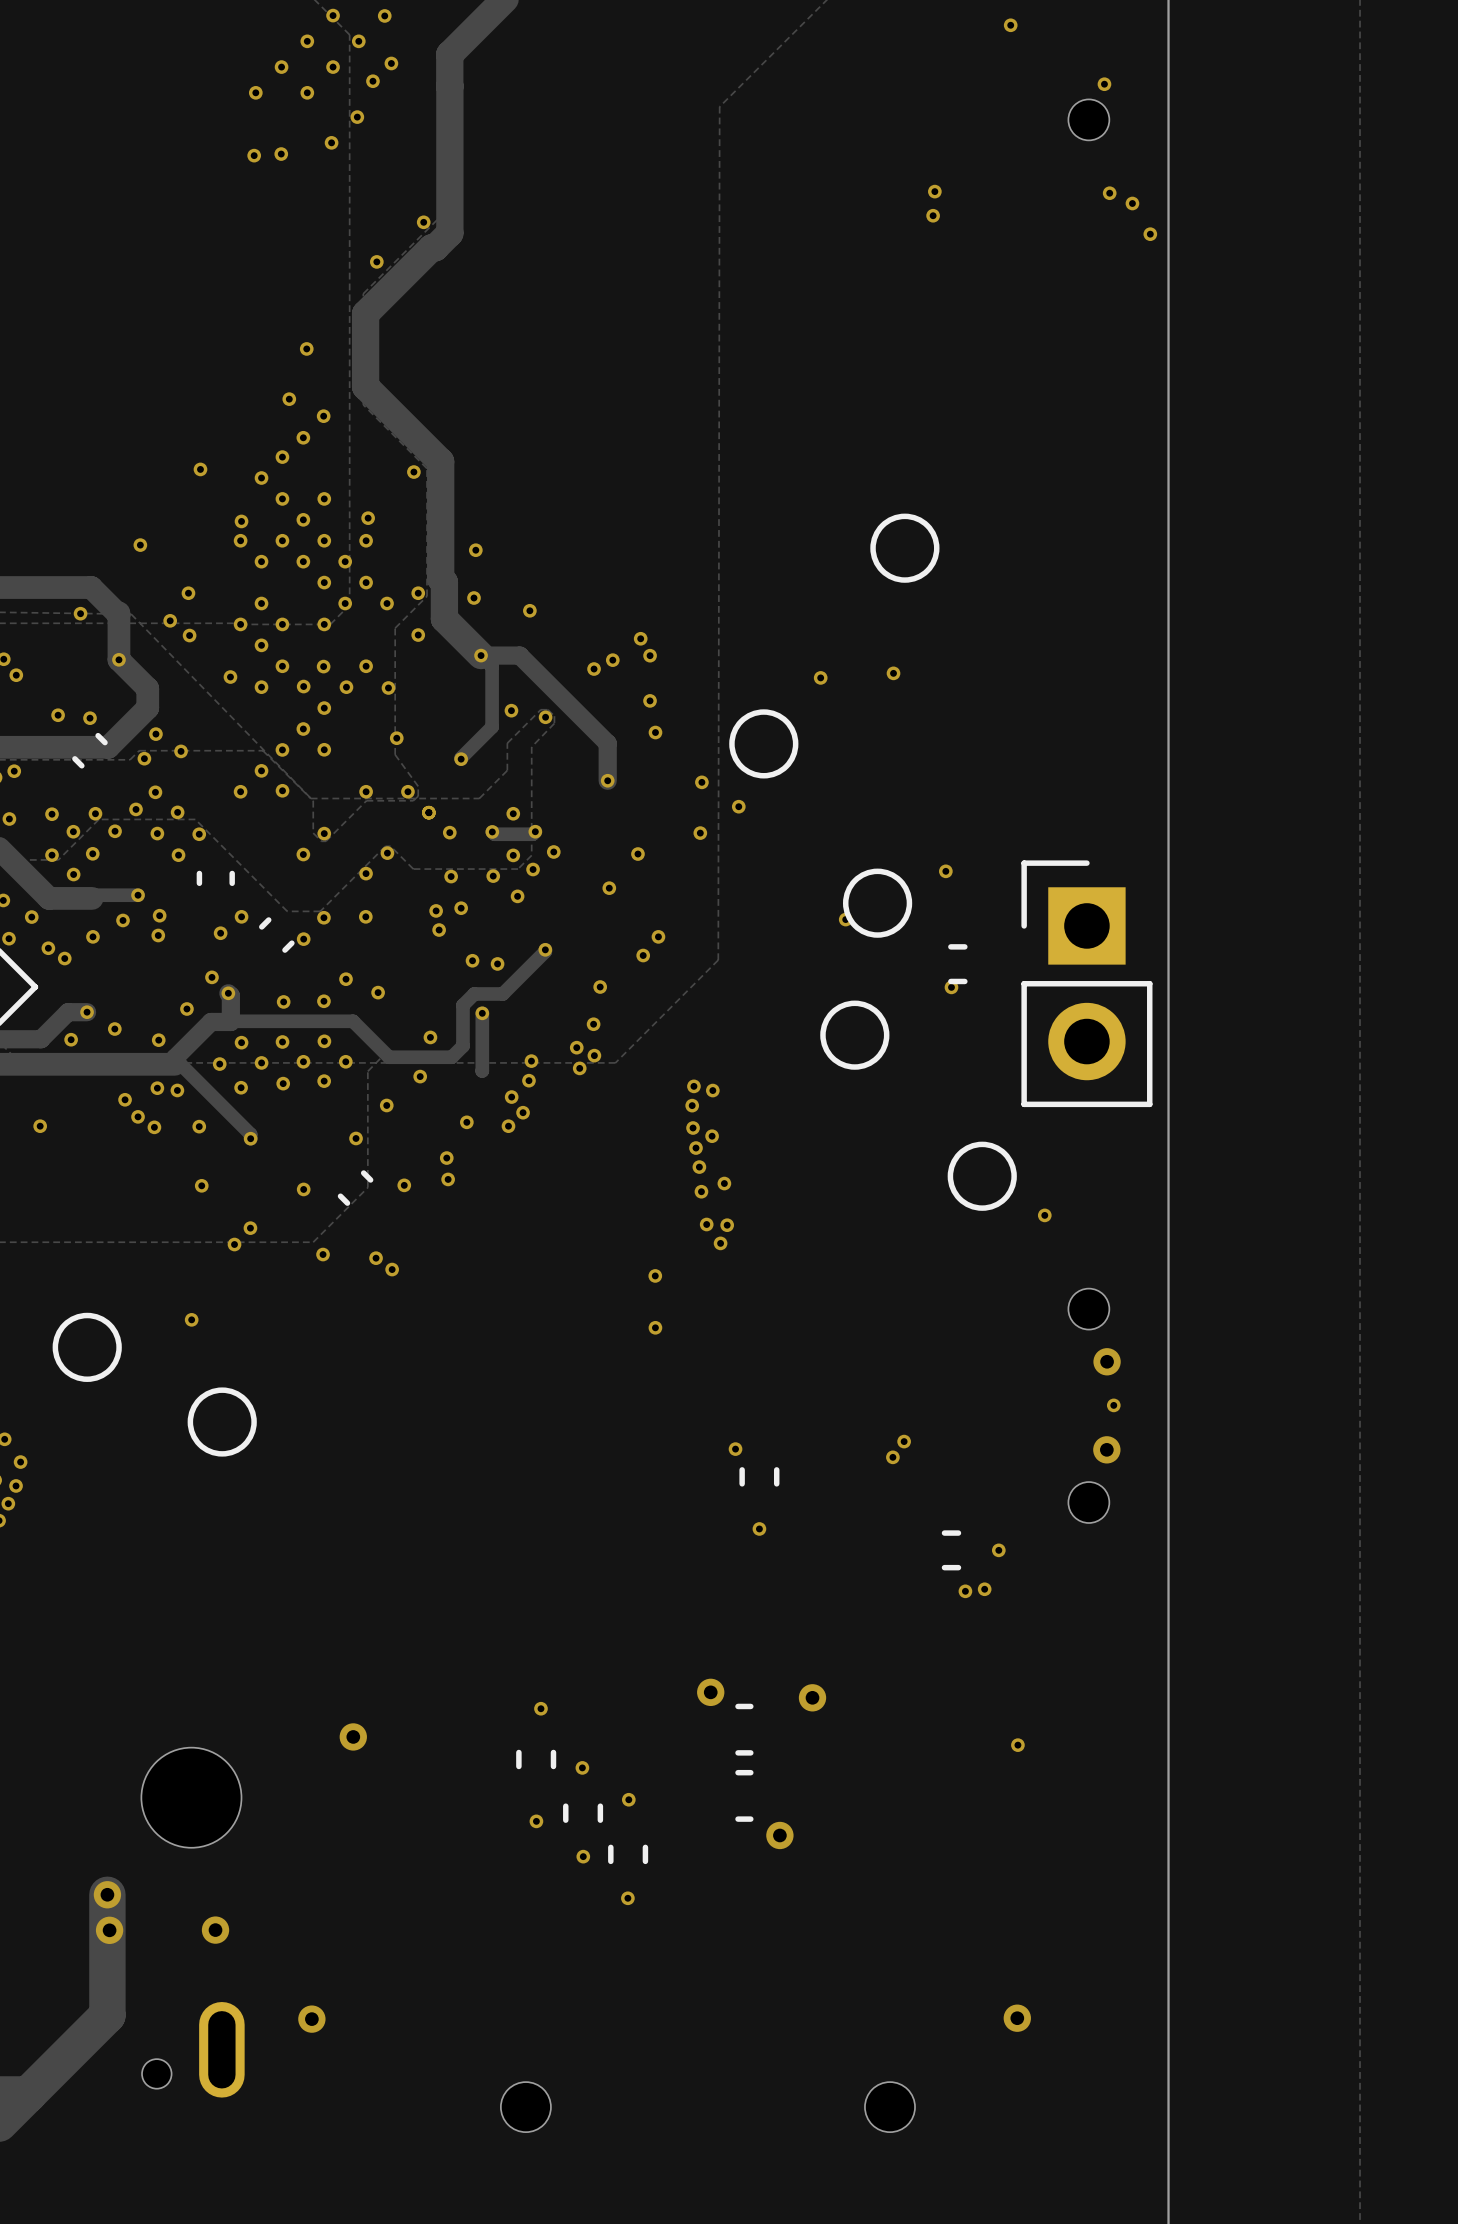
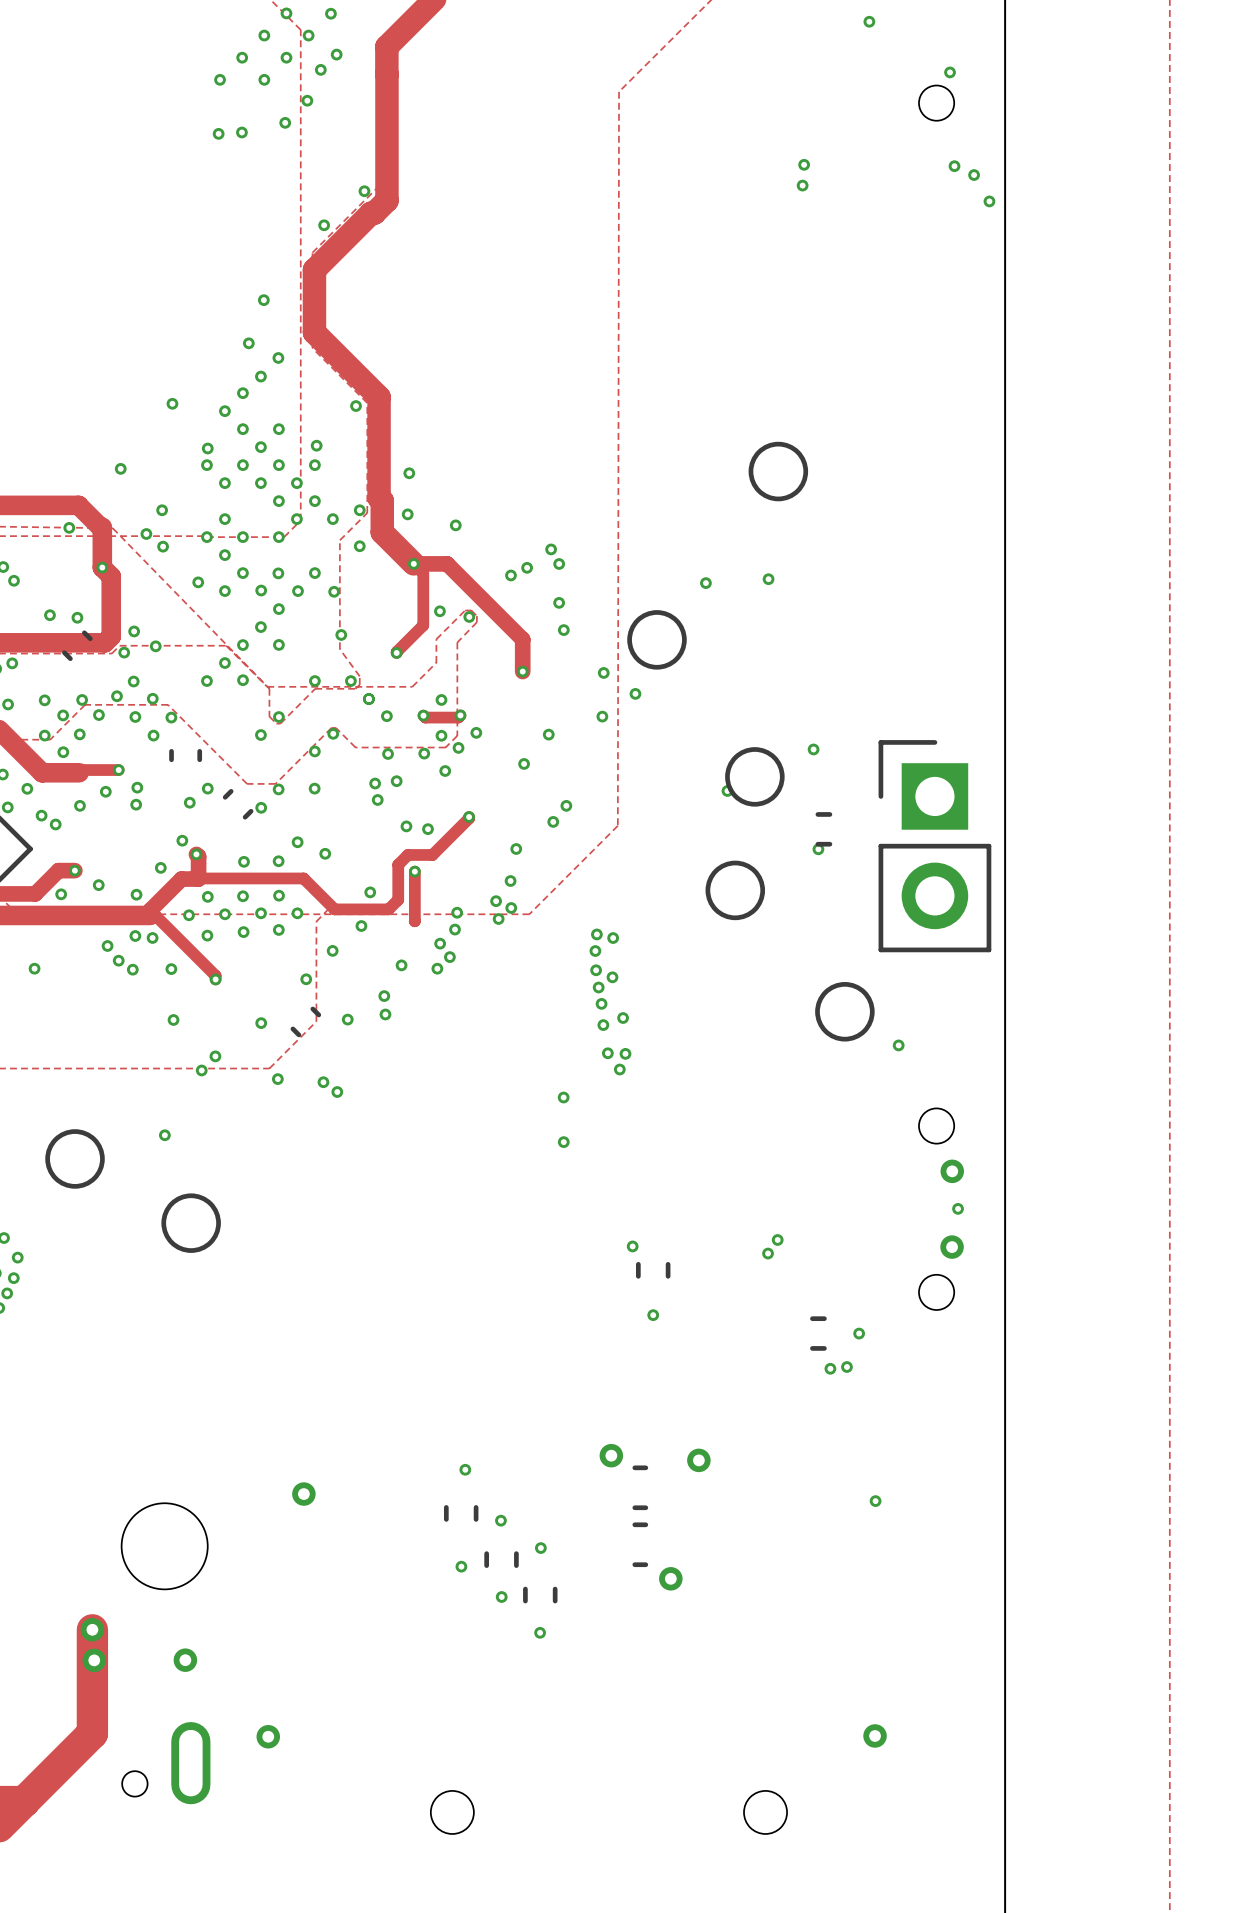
track: (129, 670) (147, 688) (147, 707) (108, 747) -> (111, 576) (111, 636) (104, 642) (93, 642)

